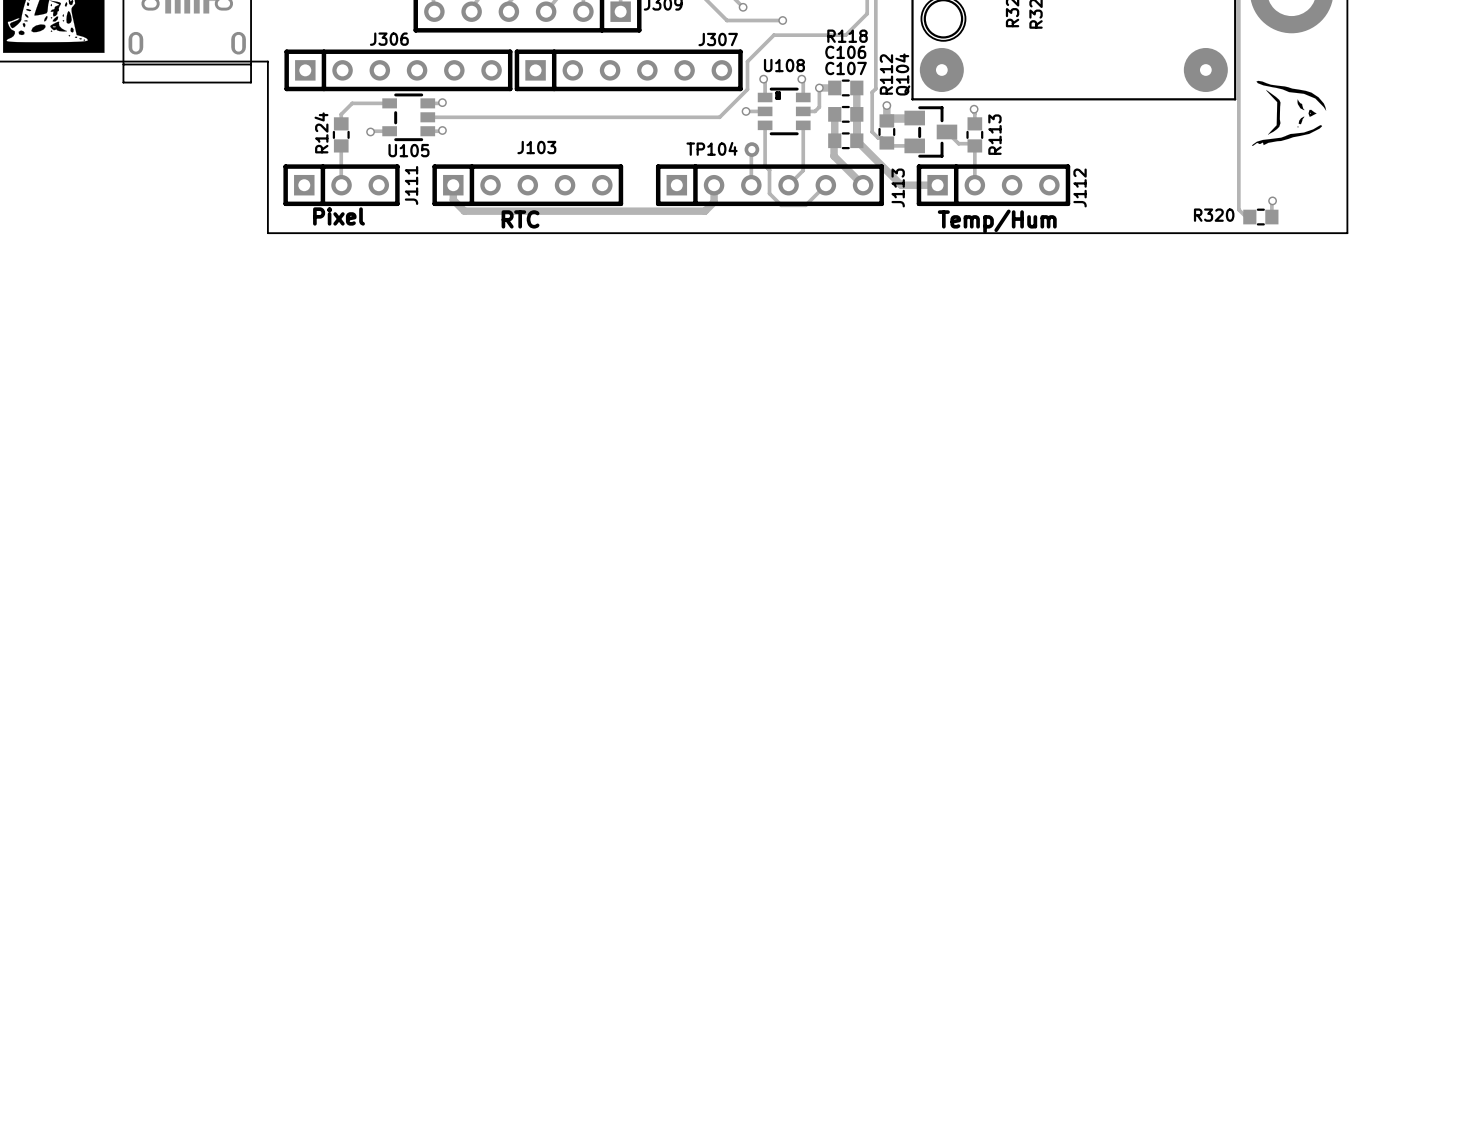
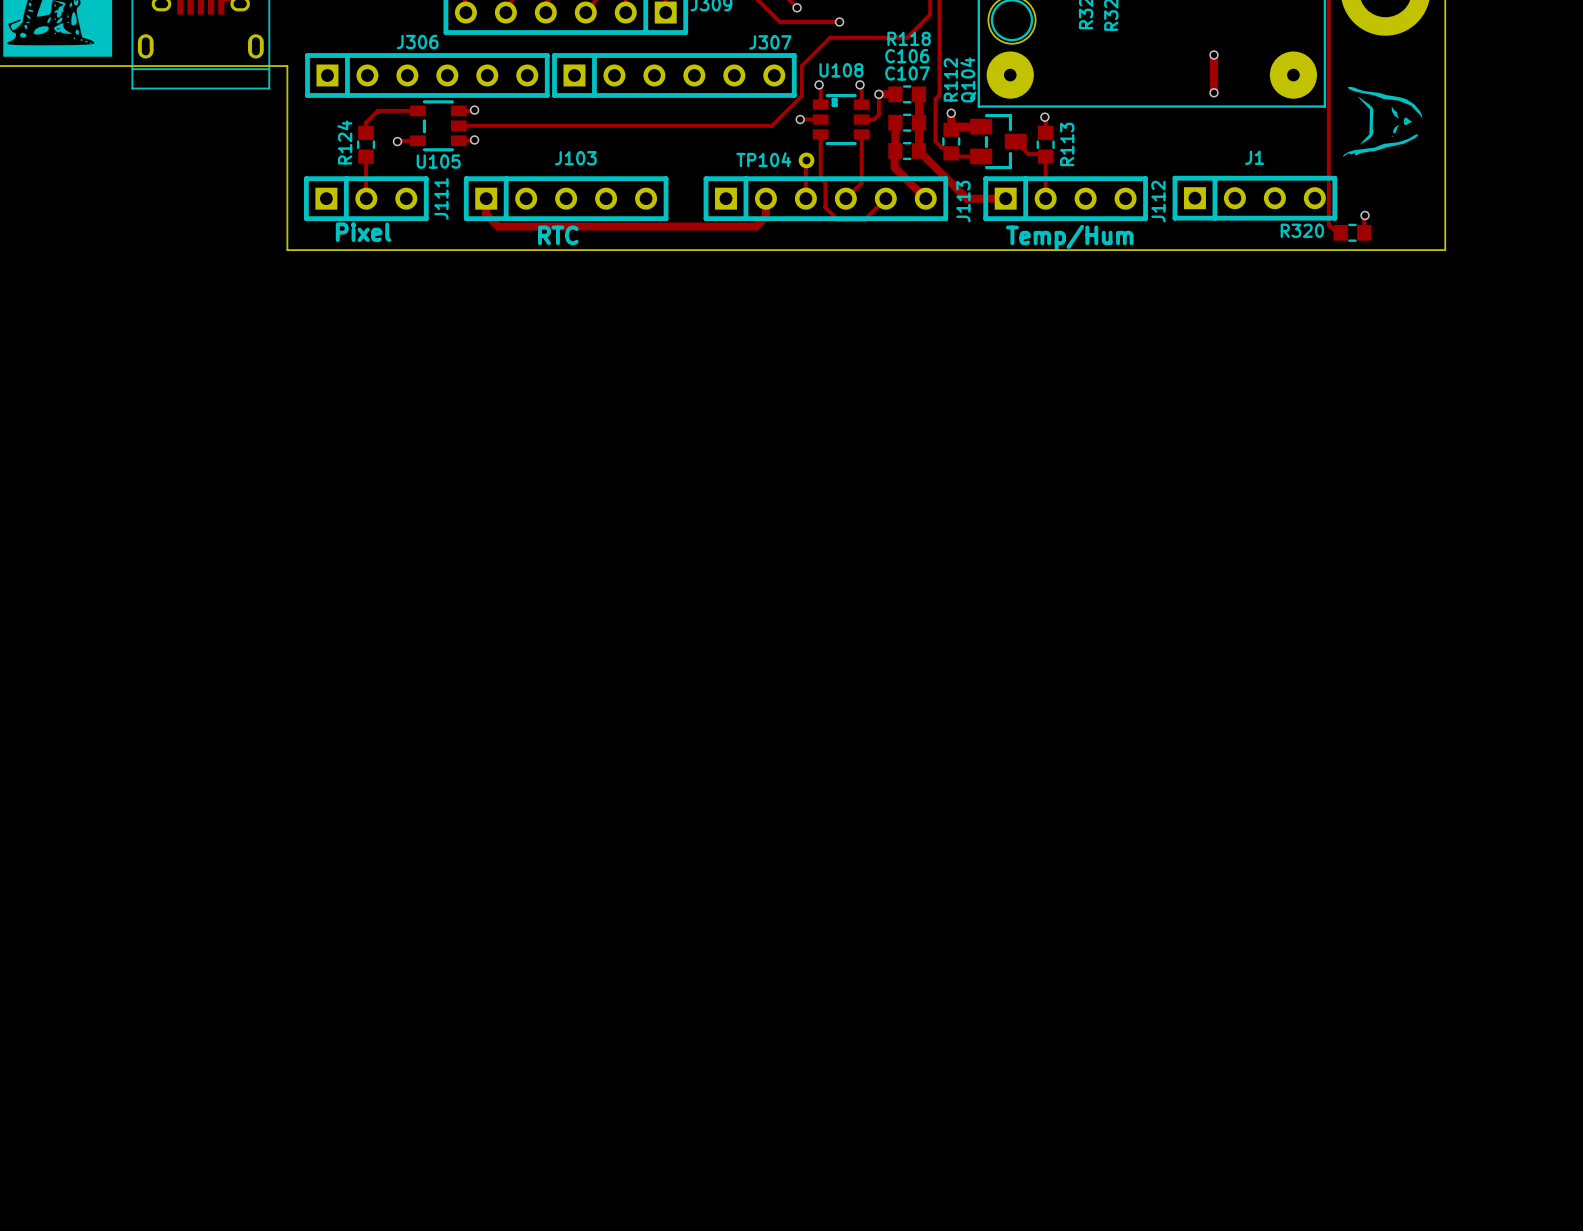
track: none -> (1213, 55) (1213, 92)
via: none -> (1213, 55)
via: none -> (1213, 92)
J1: none -> (1254, 198)

